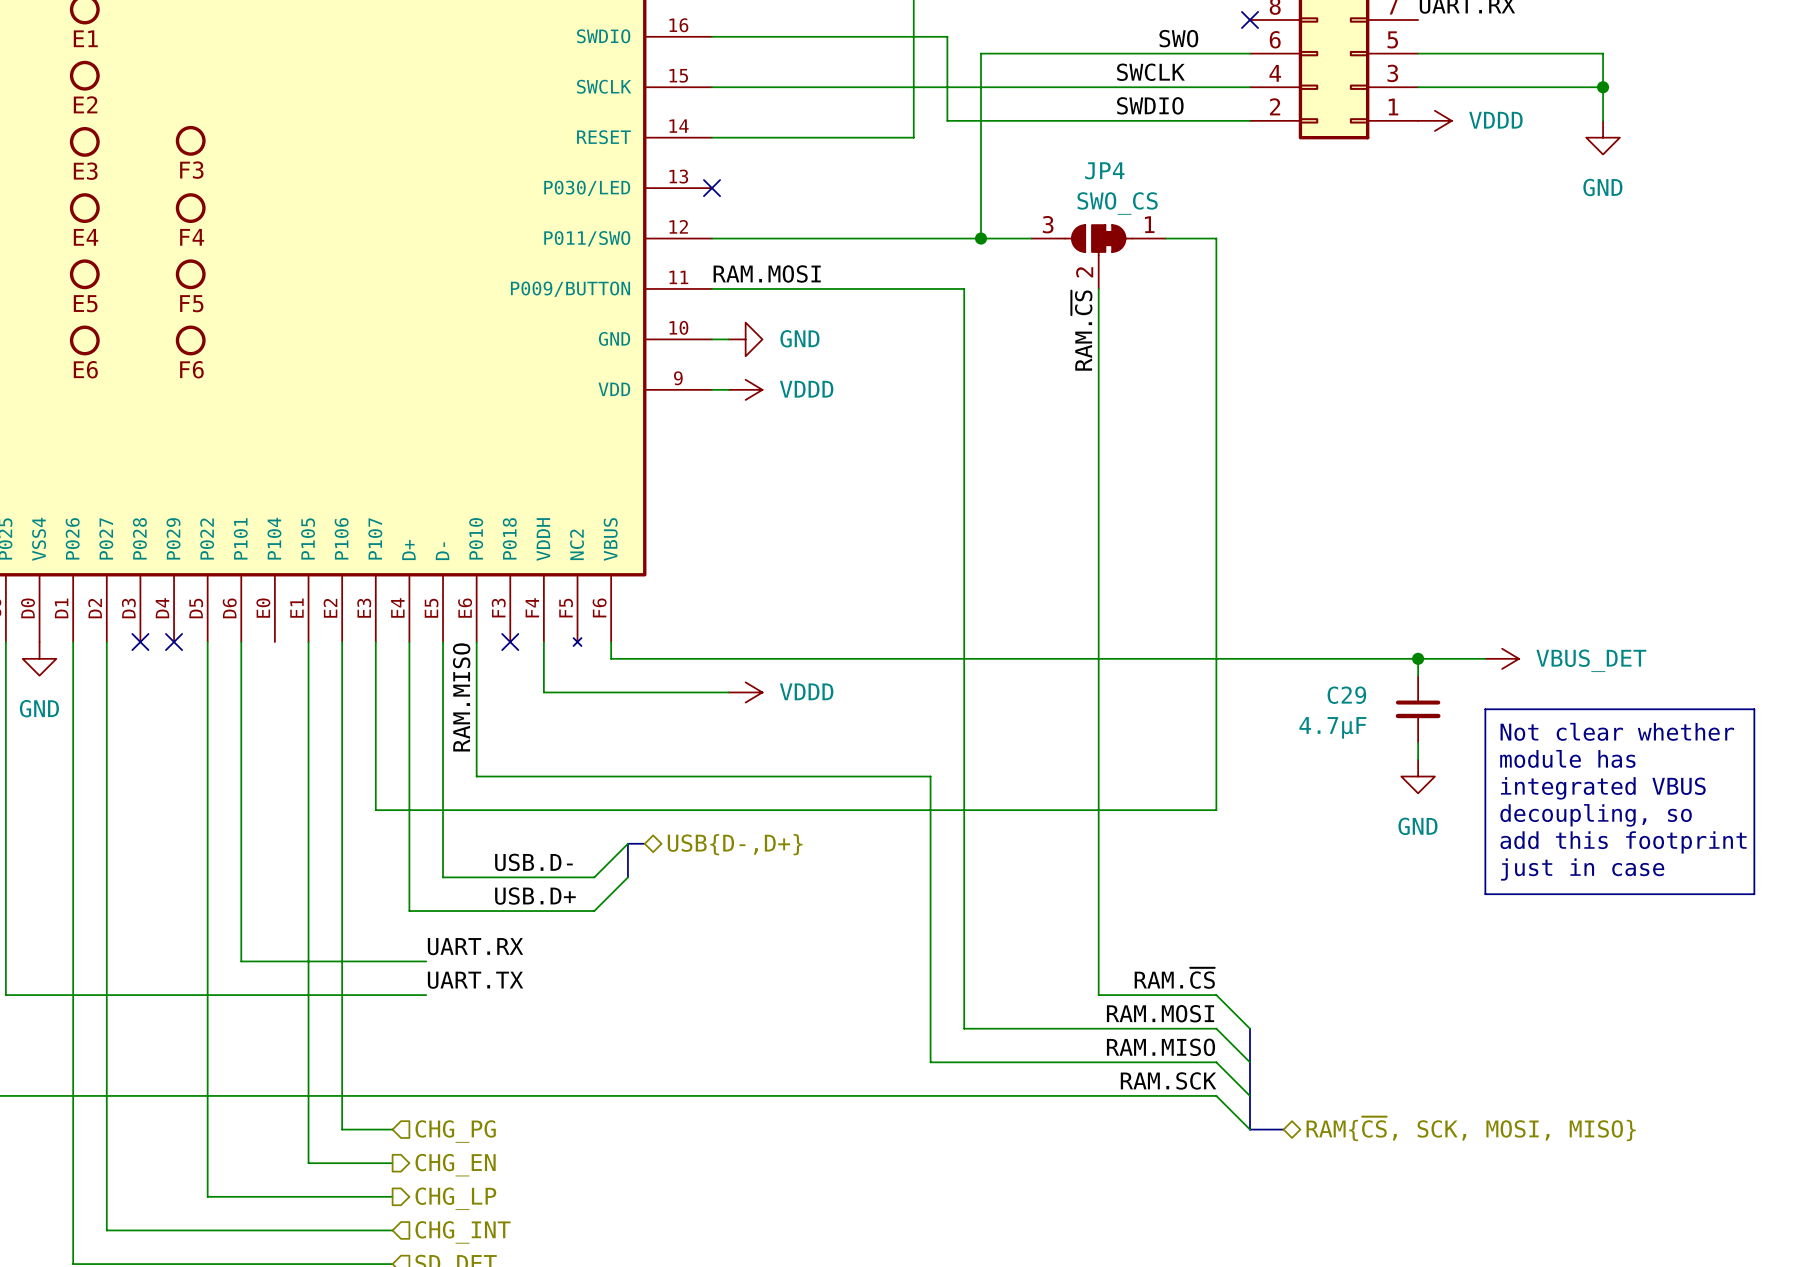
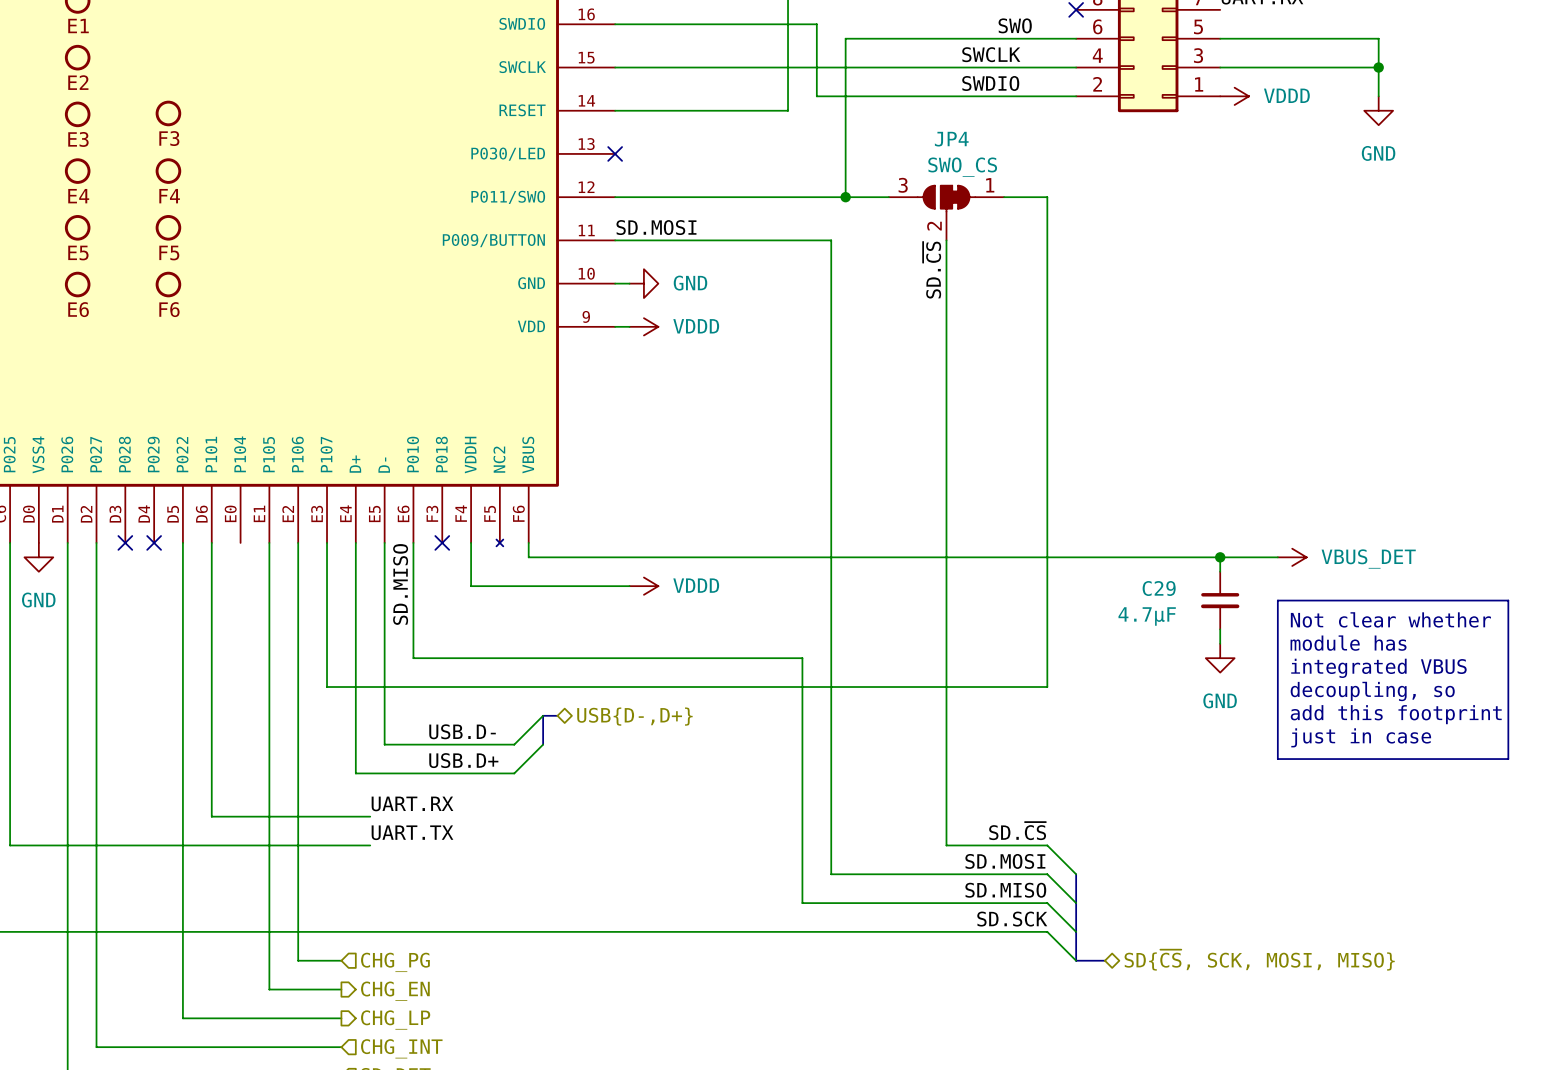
label: RAM.MOSI (767, 273) -> SD.MOSI (656, 227)
label: RAM.~{CS} (1081, 330) -> SD.~{CS} (932, 270)
label: RAM.MISO (461, 697) -> SD.MISO (400, 584)
label: RAM.~{CS} (1174, 978) -> SD.~{CS} (1017, 831)
label: RAM.MOSI (1160, 1013) -> SD.MOSI (1005, 861)
label: RAM.MISO (1160, 1047) -> SD.MISO (1005, 890)
label: RAM.SCK (1168, 1080) -> SD.SCK (1012, 919)
hierarchical label: RAM{~{CS}, SCK, MOSI, MISO} (1471, 1128) -> SD{~{CS}, SCK, MOSI, MISO} (1259, 960)

